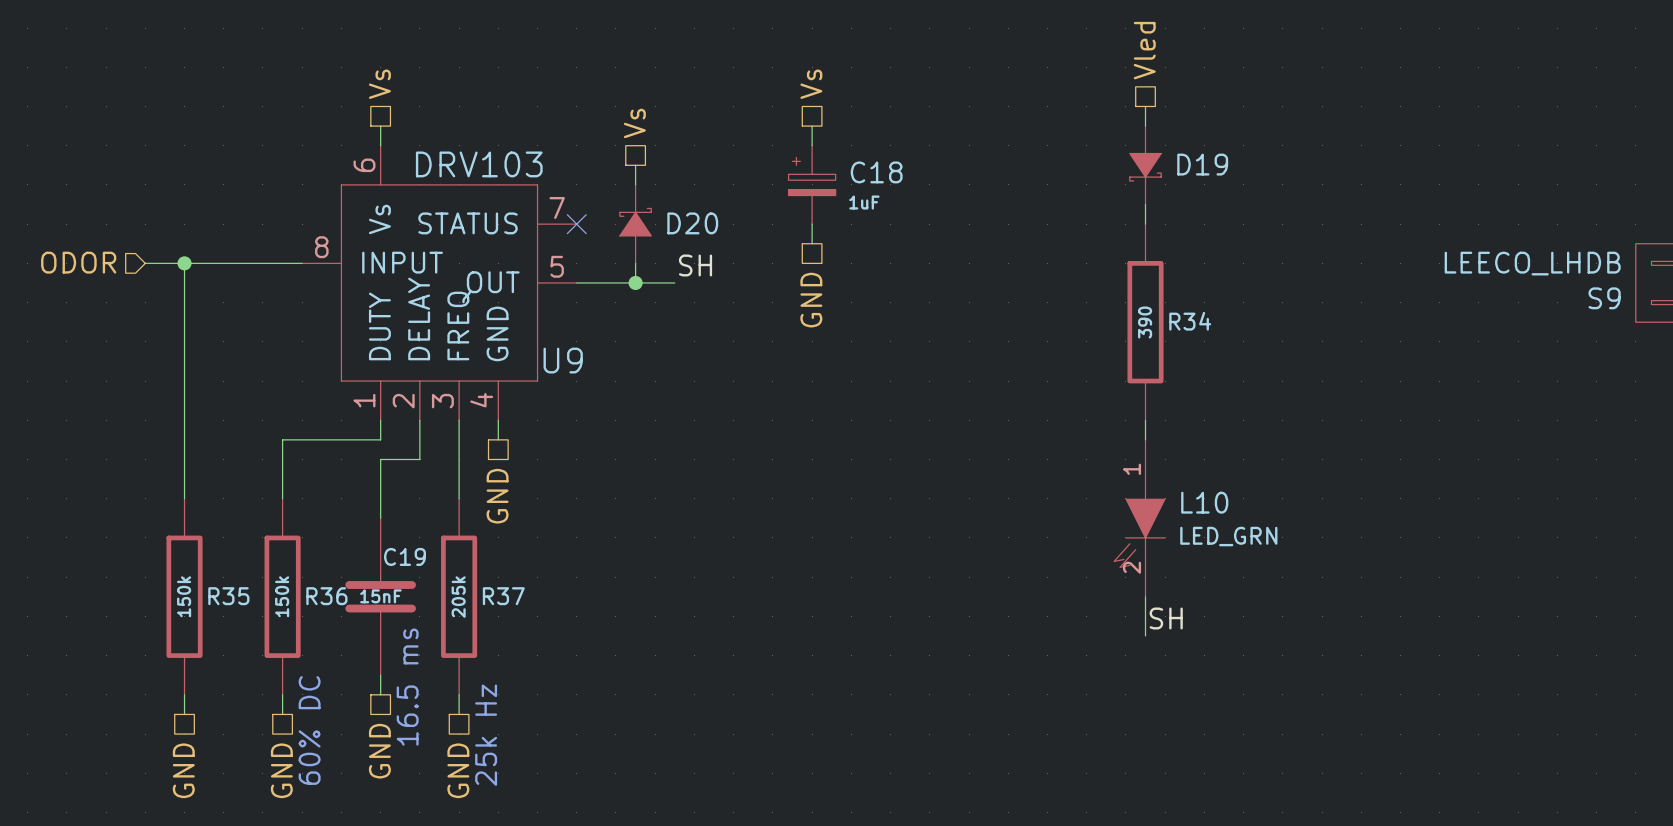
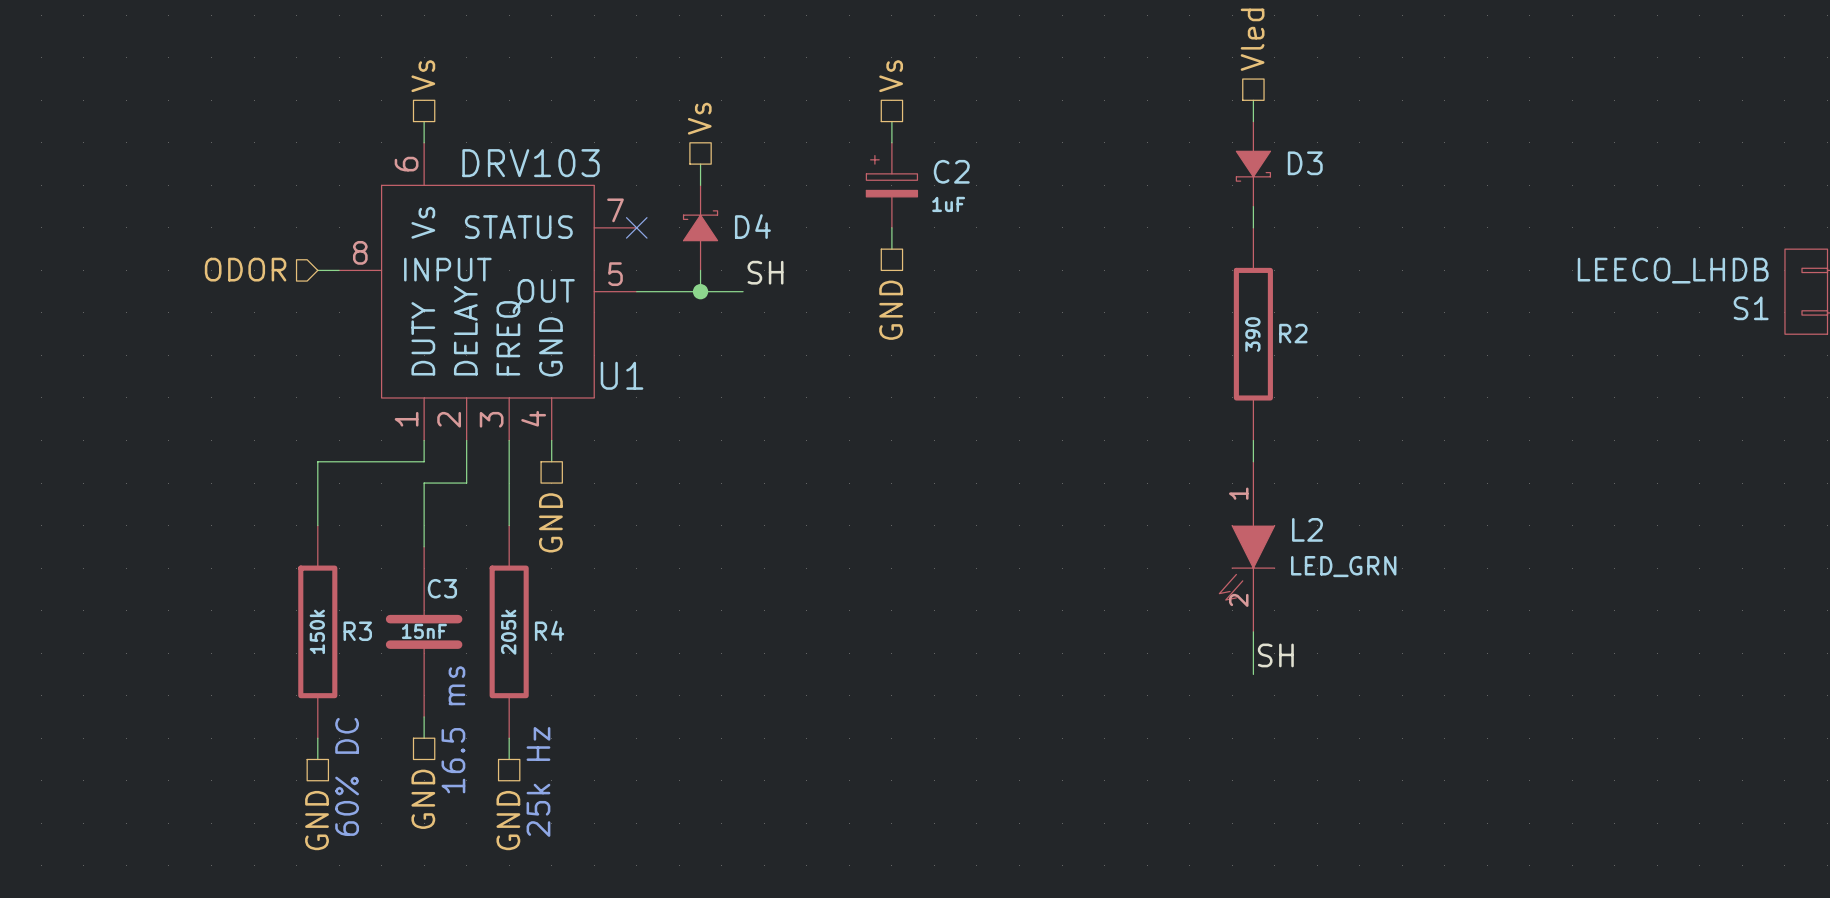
D19 name: D19 (1202, 164) -> D3 (1305, 163)
C18 name: C18 (876, 172) -> C2 (951, 171)
D20 name: D20 (692, 223) -> D4 (752, 226)
hierarchical label position: ODOR (78, 262) -> ODOR (245, 269)
wire: (145, 263) (282, 263) -> none
wire: (184, 263) (184, 498) -> none
junction: (184, 263) -> none
S9 name: S9 (1604, 298) -> S1 (1751, 308)
R34 name: R34 (1190, 321) -> R2 (1293, 333)
U9 name: U9 (563, 360) -> U1 (622, 375)
L10 name: L10 (1204, 502) -> L2 (1307, 529)
C19 name: C19 (404, 556) -> C3 (442, 588)
R35: 150k (184, 596) -> none
R36 name: R36 (326, 596) -> R3 (357, 631)
R37 name: R37 (503, 596) -> R4 (549, 630)
wire: (184, 694) (184, 714) -> none
hierarchical label: GND (183, 770) -> none

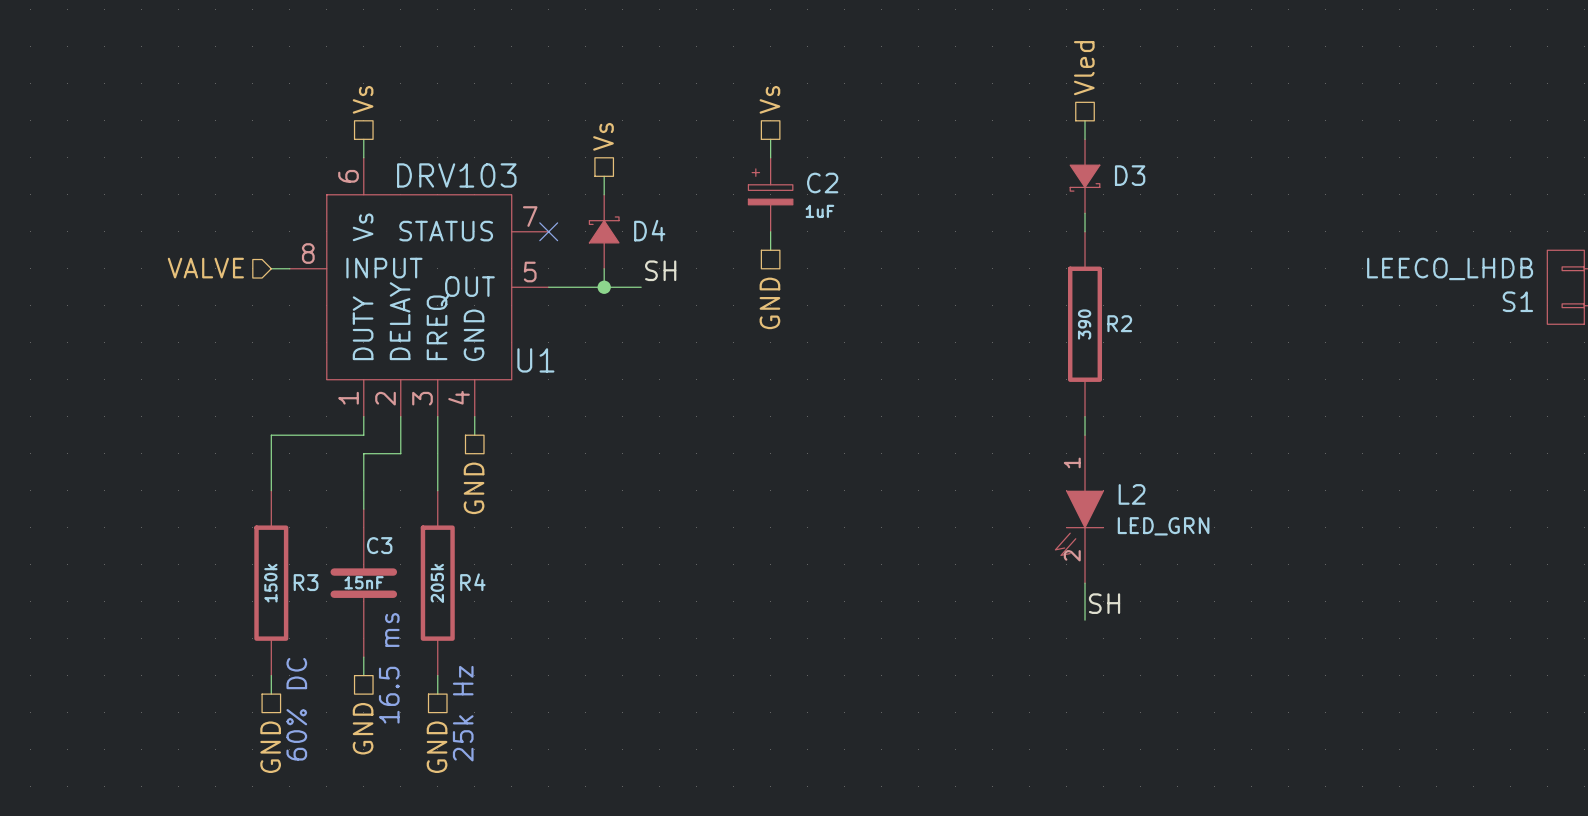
hierarchical label: ODOR (245, 269) -> VALVE (205, 268)

